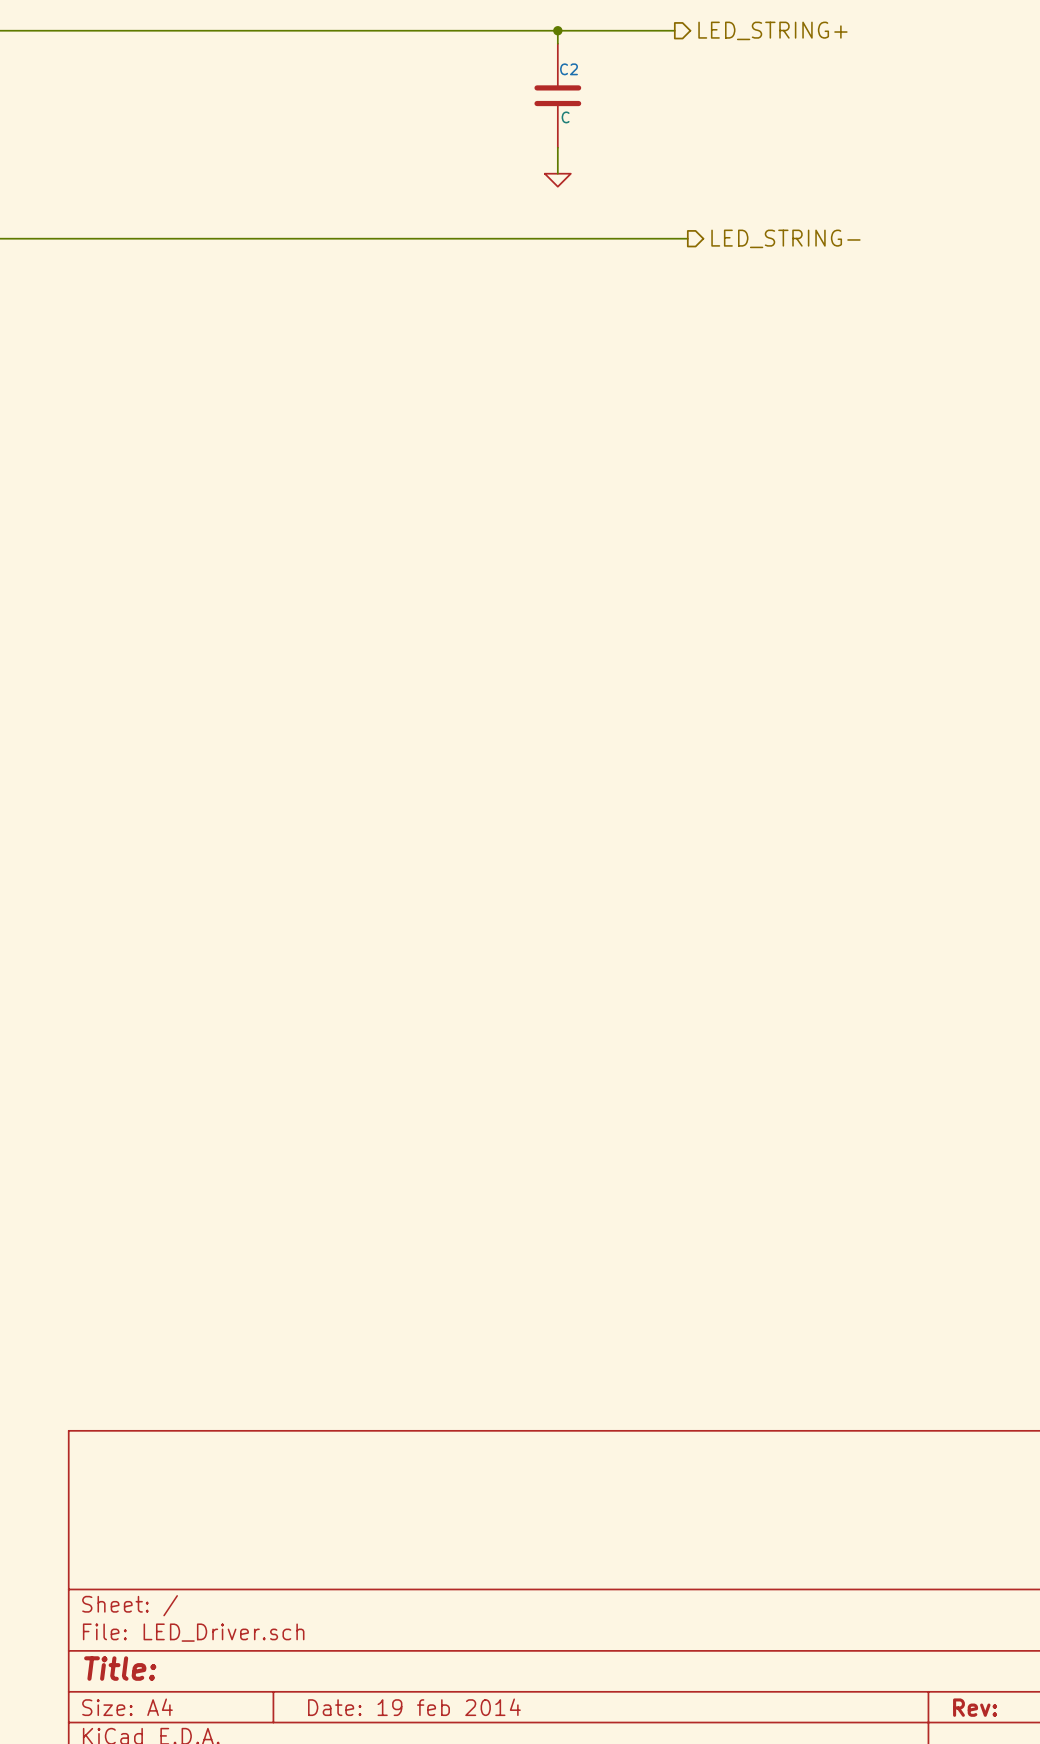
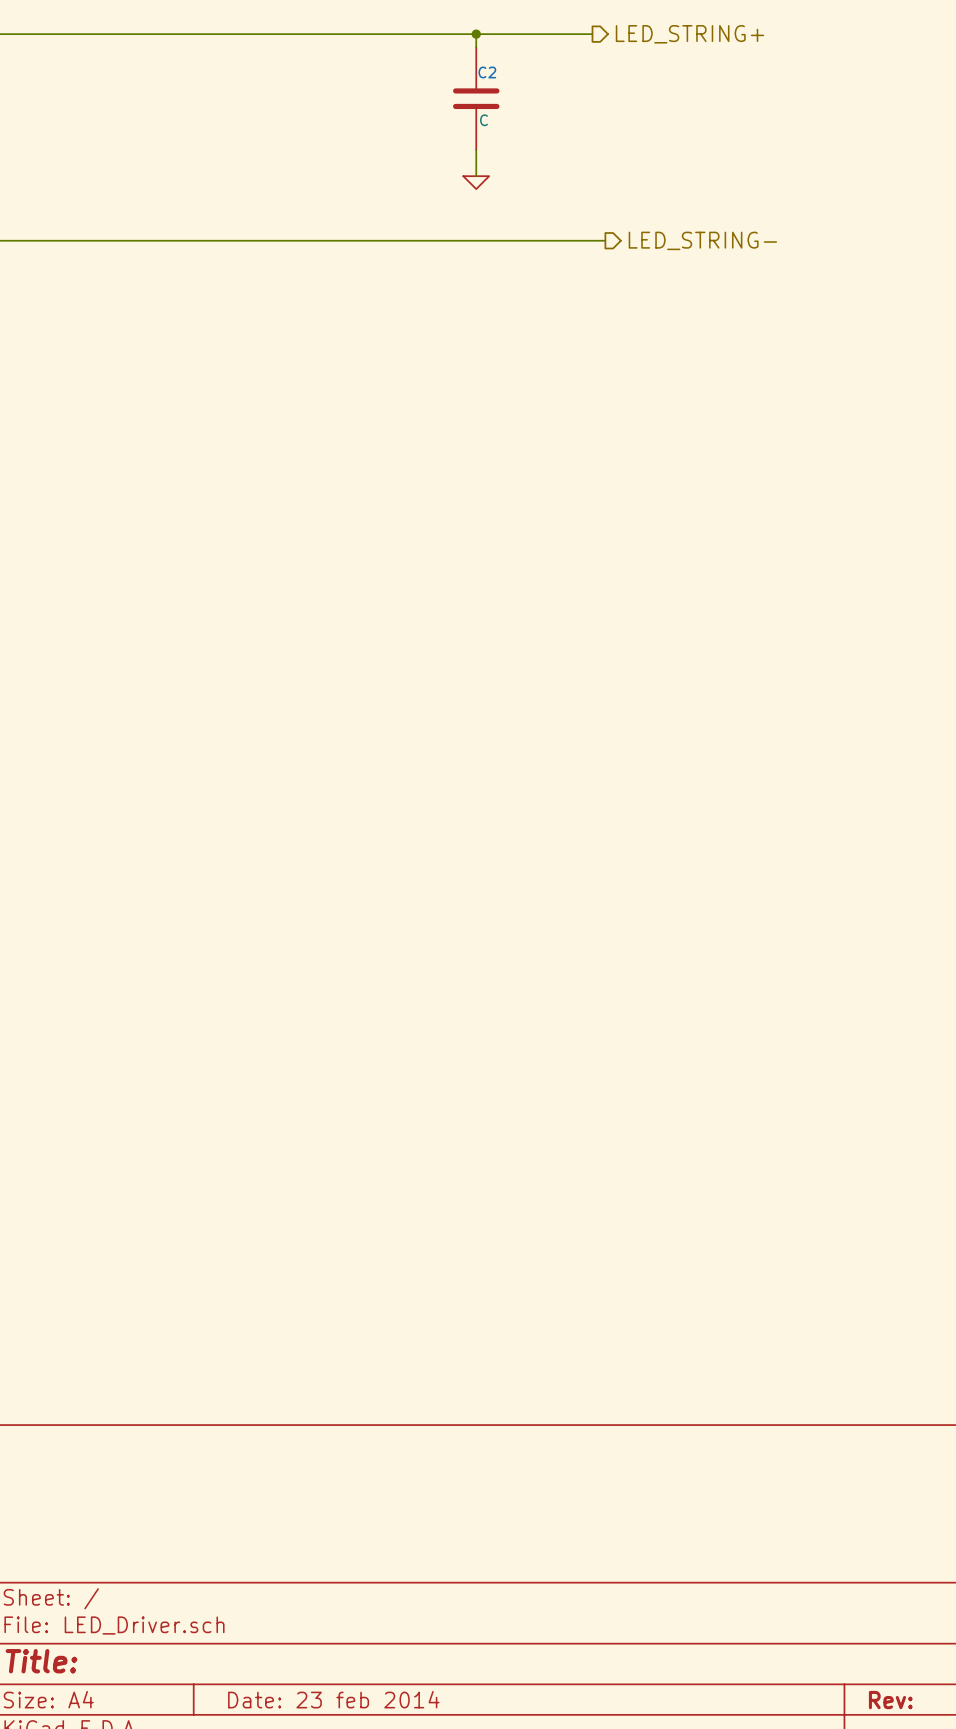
title block: Date: 19 feb 2014 (414, 1707) -> Date: 23 feb 2014 (333, 1699)

